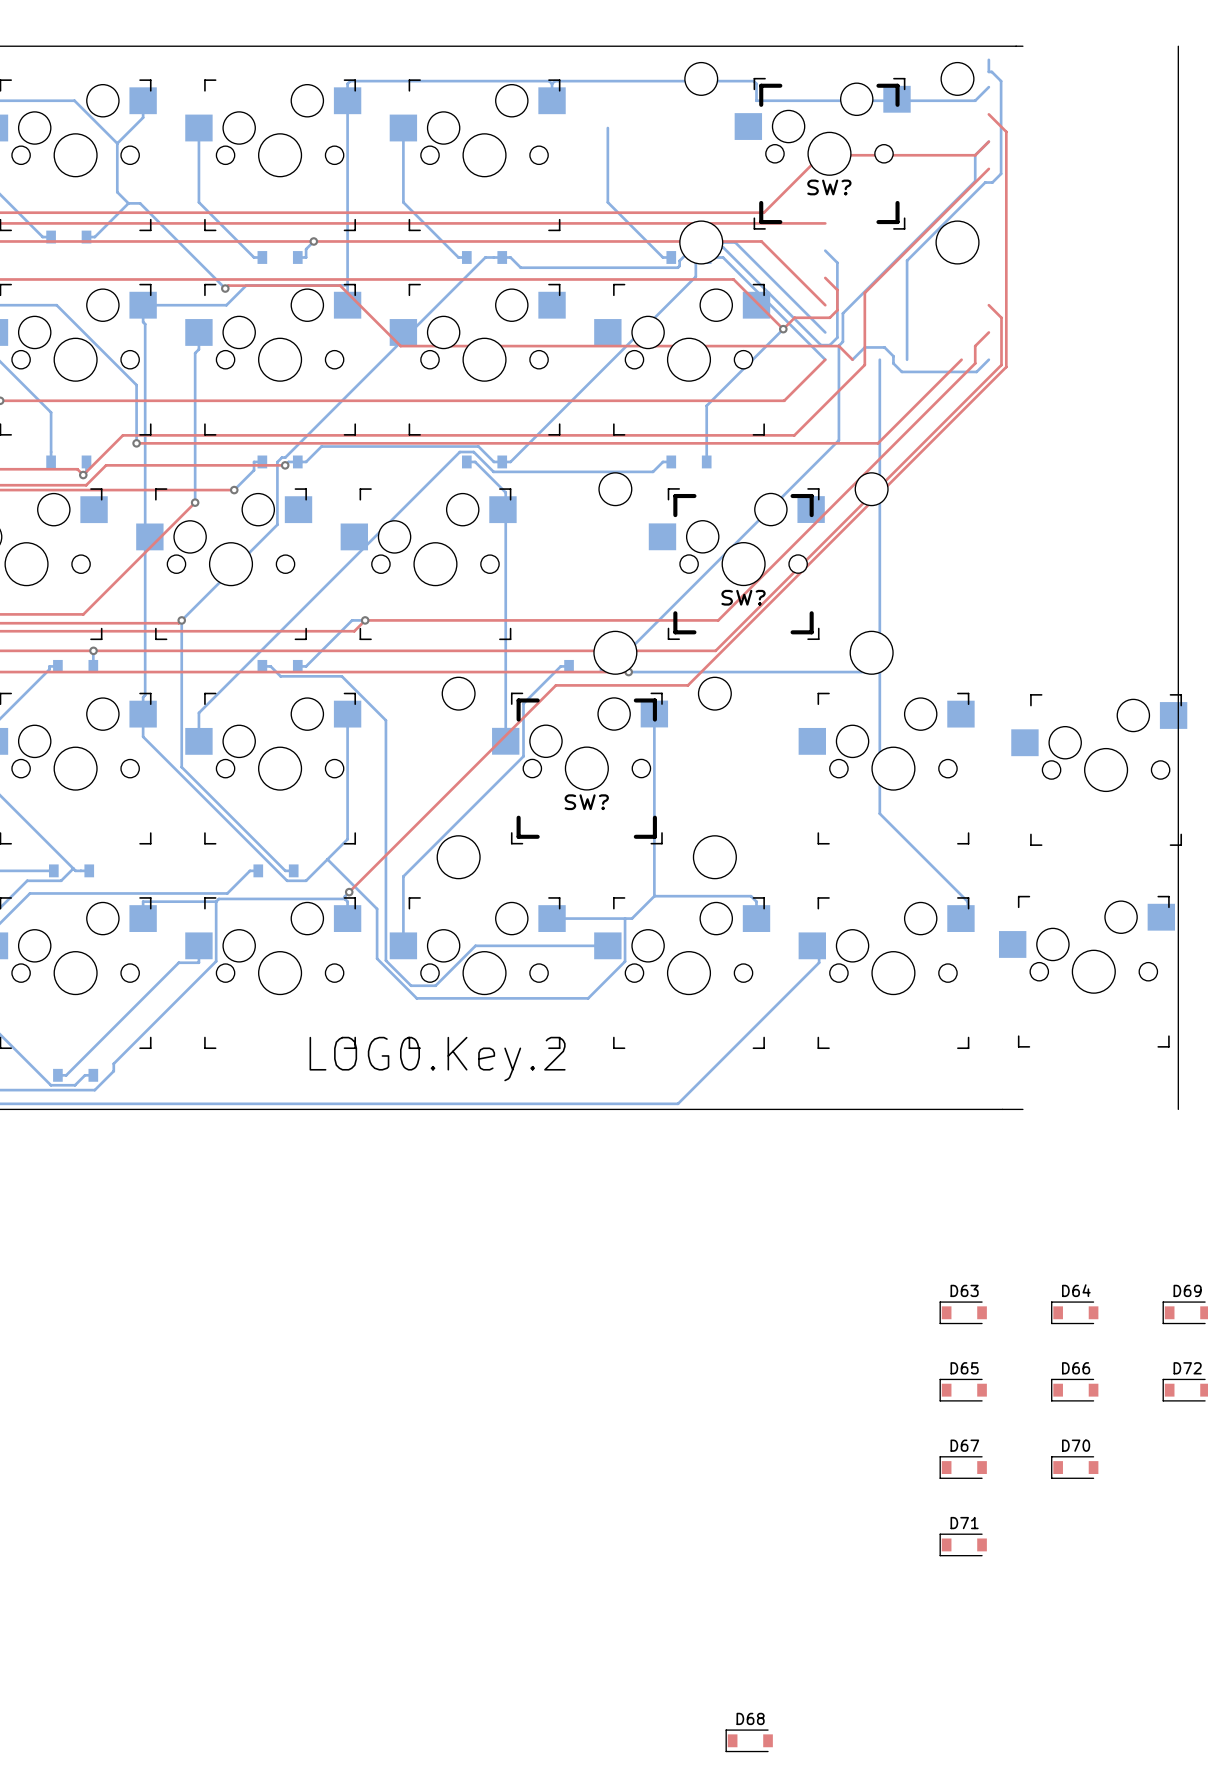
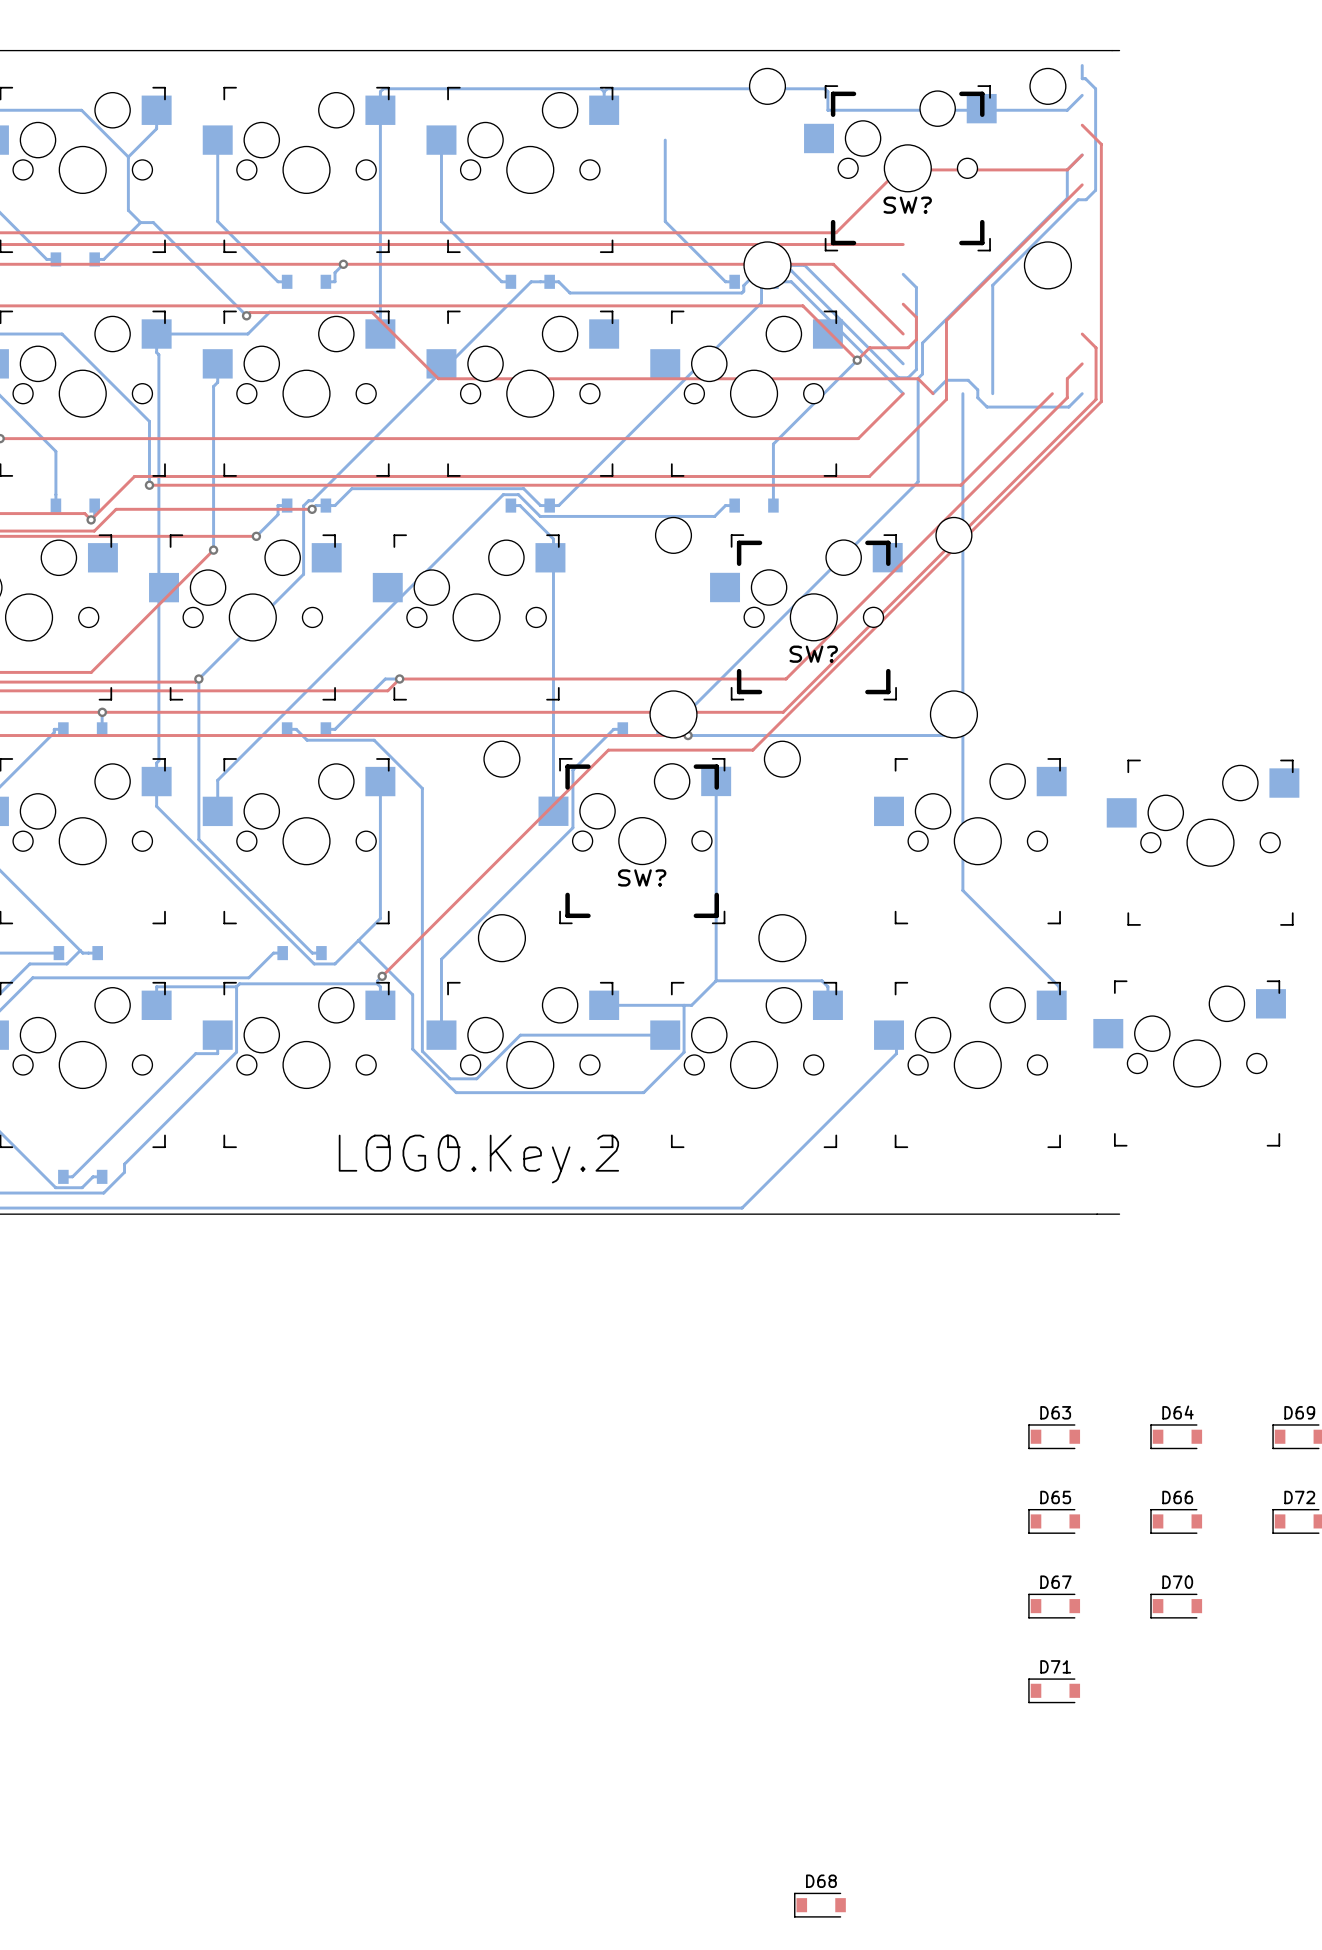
board edge: (1178, 46) (1178, 1109) -> none

